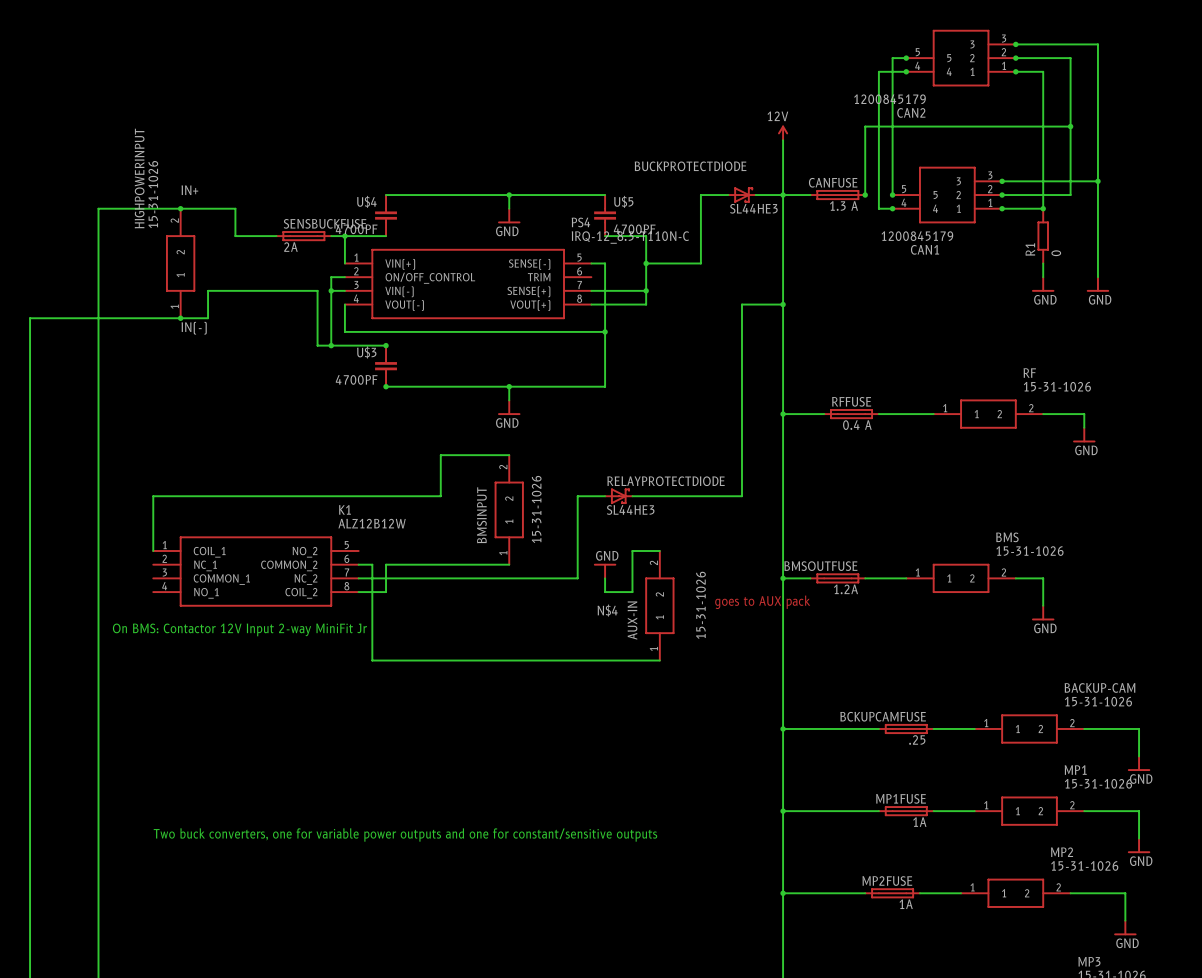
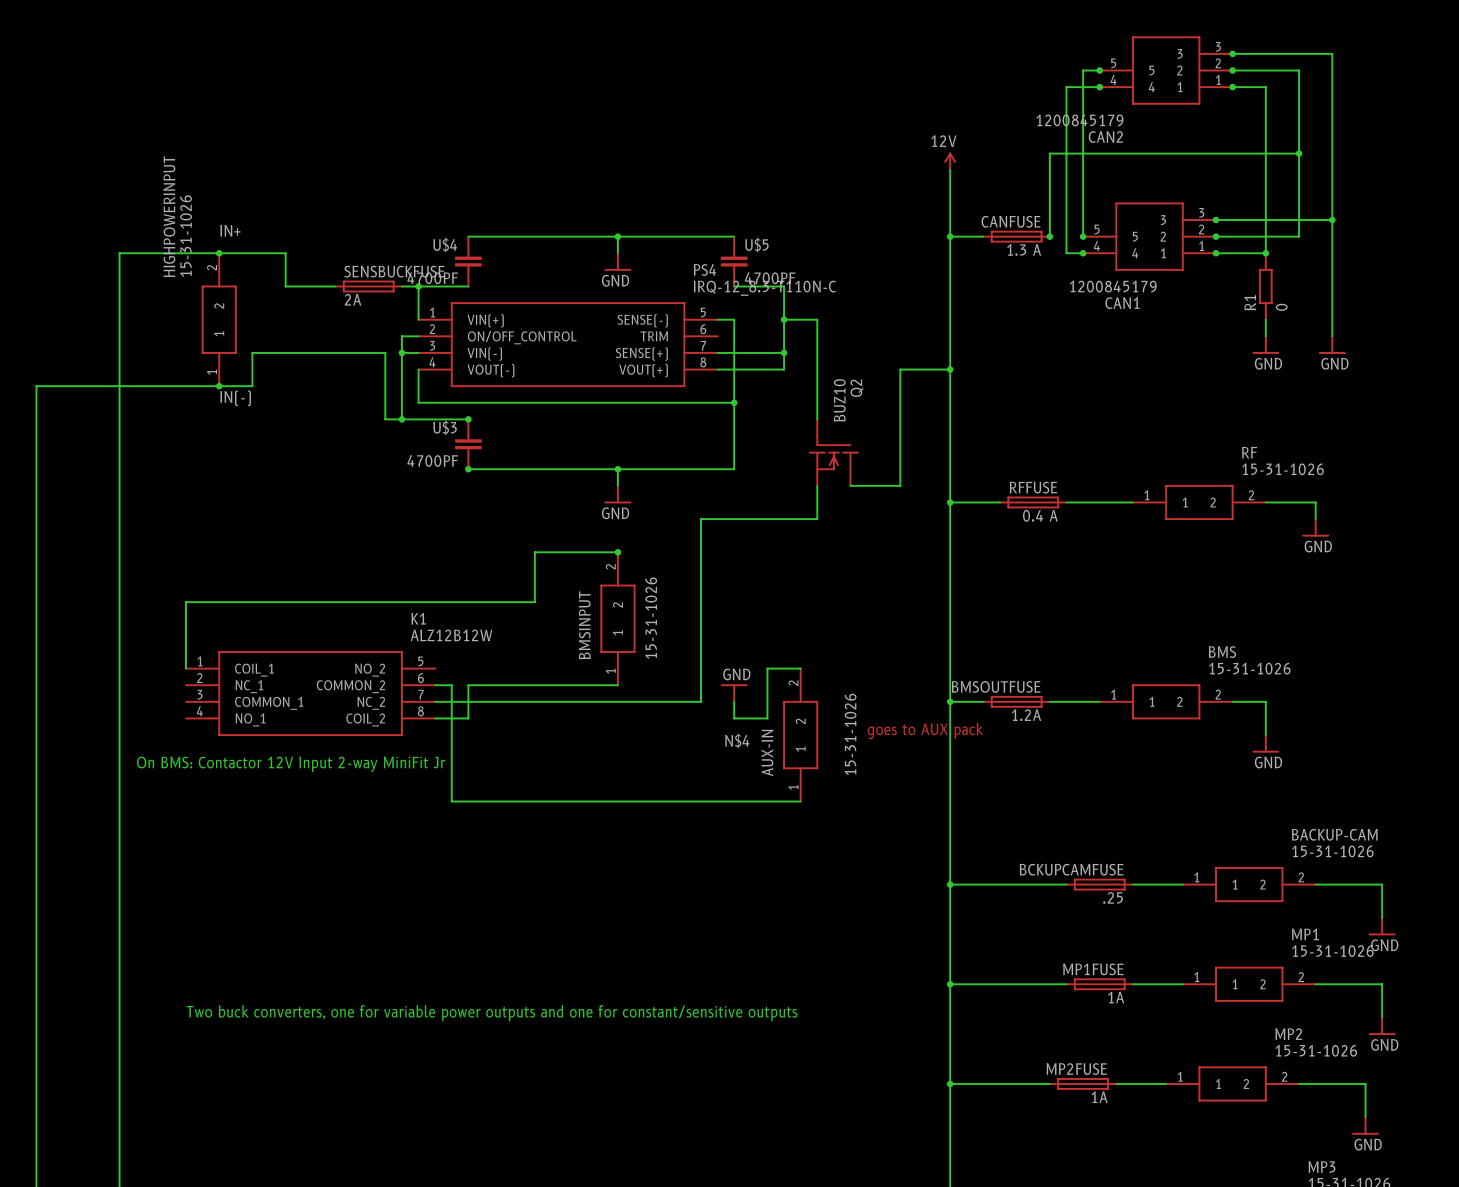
wire: (728, 195) (700, 195) (700, 263) (673, 263) -> (817, 419) (817, 319)
BUCKPROTECTDIODE: SL44HE3 (741, 195) -> none
wire: (755, 195) (783, 195) -> none
Q2: none -> BUZ10 (833, 452)
wire: (741, 400) (741, 496) (632, 496) -> (900, 485) (850, 485)
junction: none -> (617, 552)
wire: (577, 496) (605, 496) -> (701, 602) (701, 519) (817, 519) (817, 485)
RELAYPROTECTDIODE: SL44HE3 (618, 496) -> none

